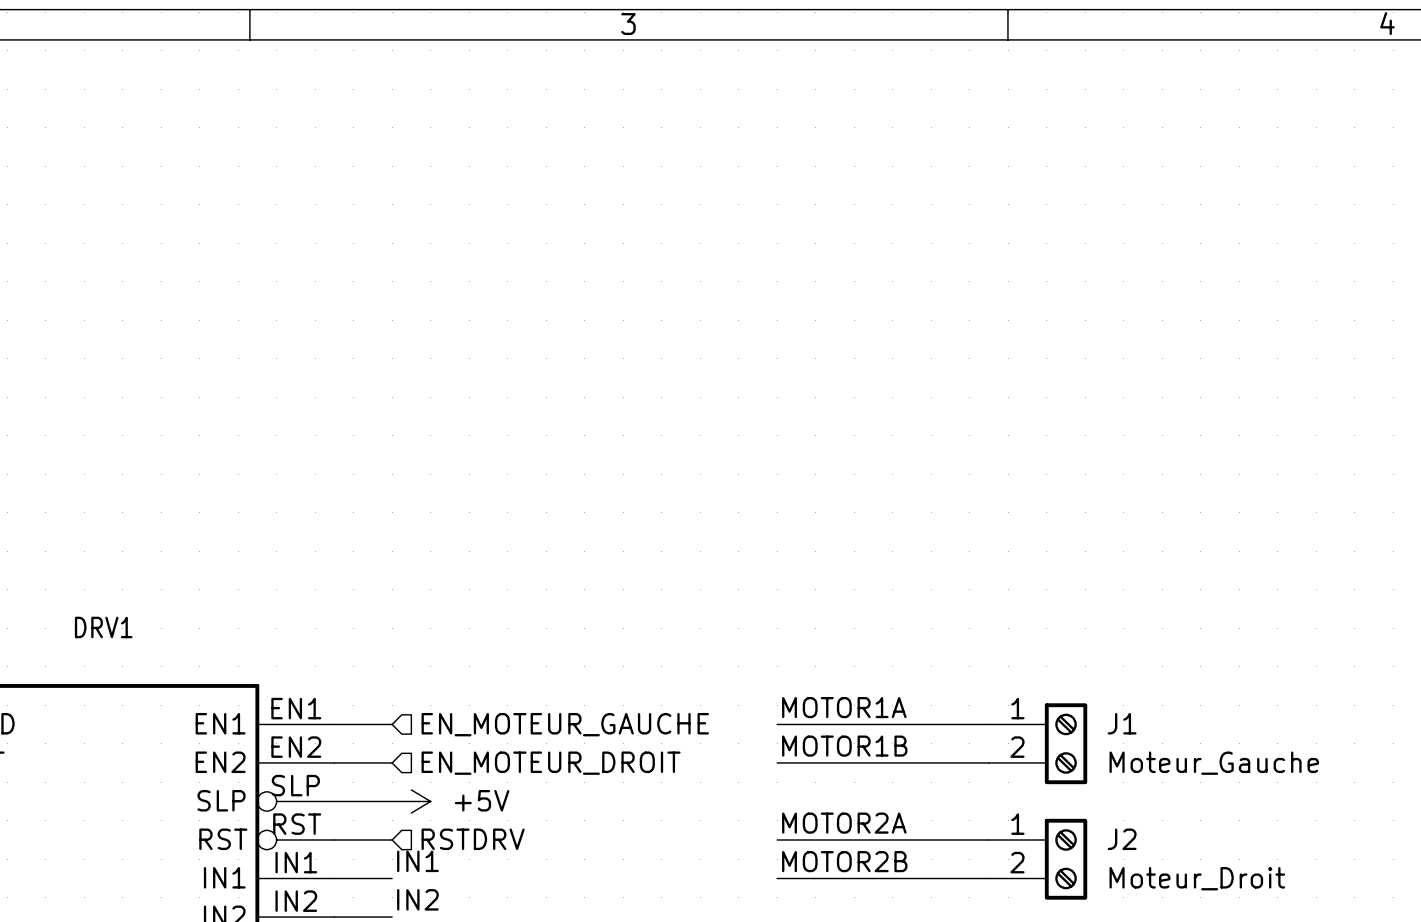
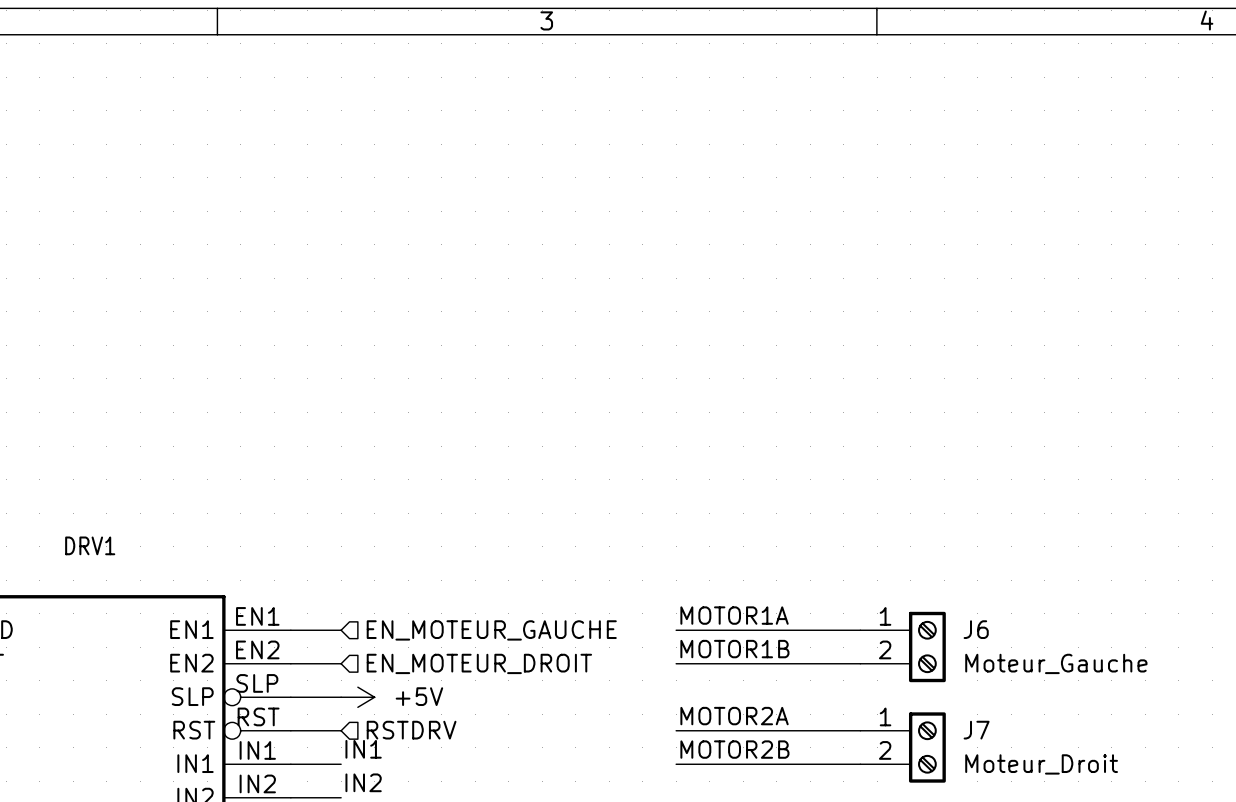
J1 name: J1 (1122, 723) -> J6 (976, 629)
J2 name: J2 (1122, 839) -> J7 (976, 730)

